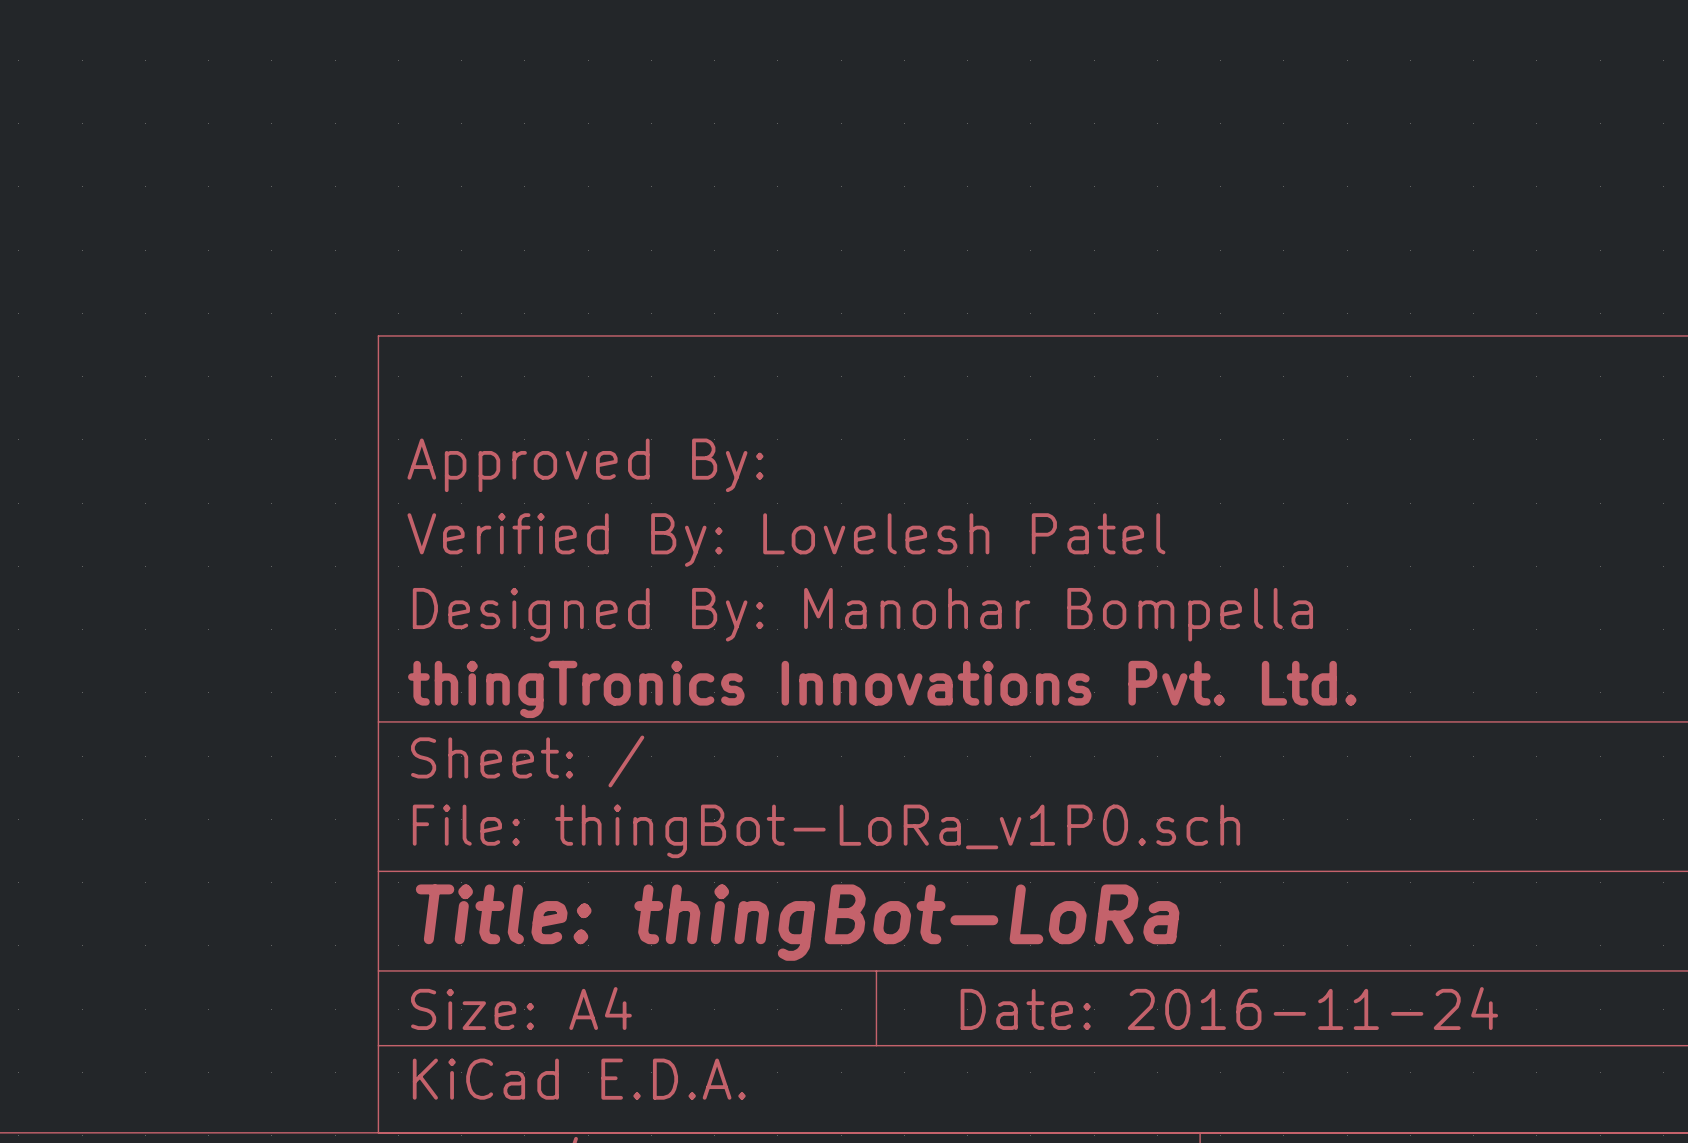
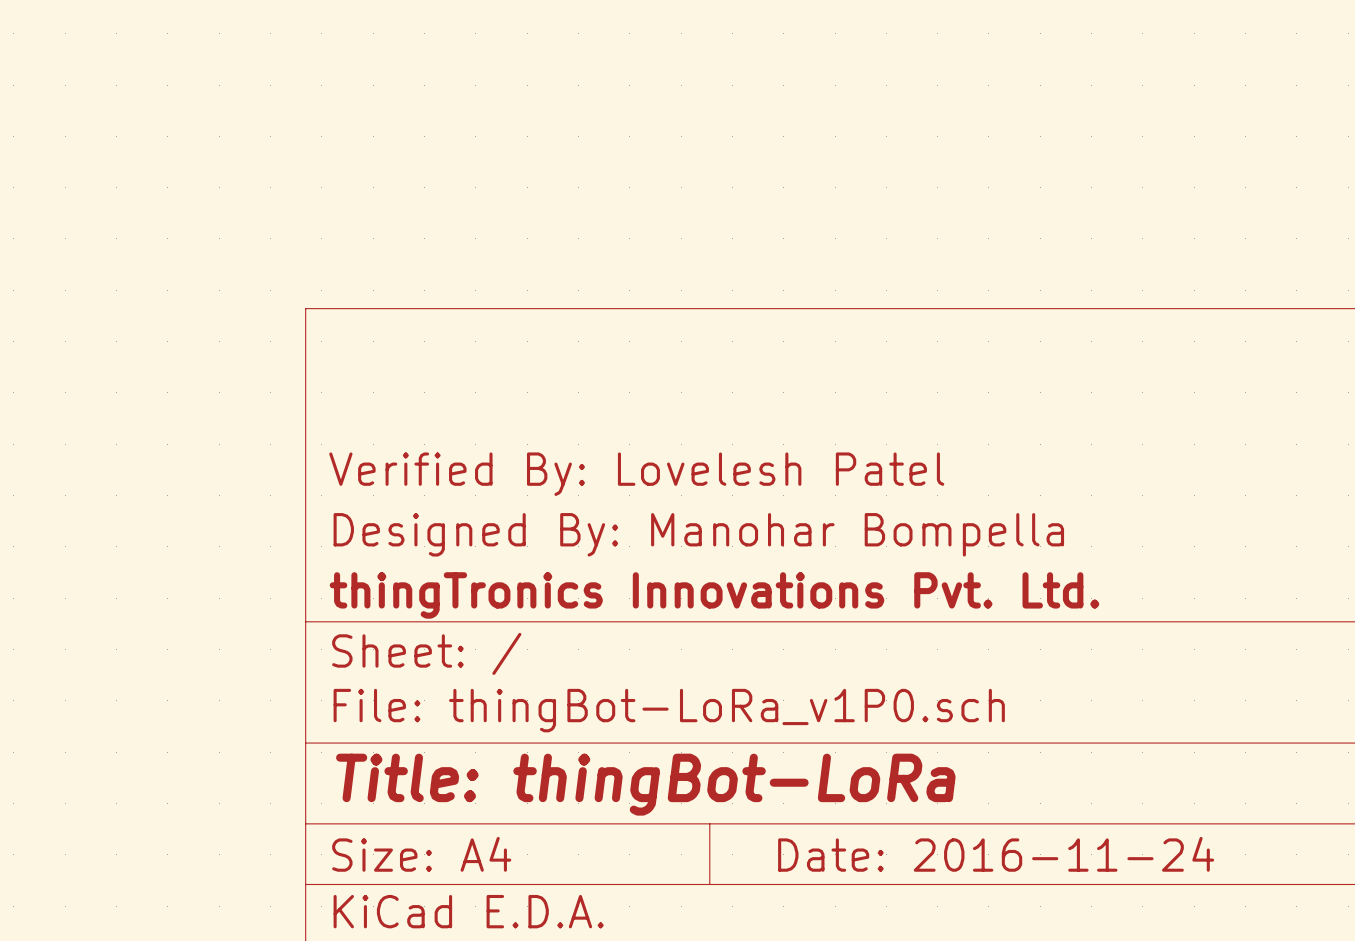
title block: Approved By: (585, 465) -> none

